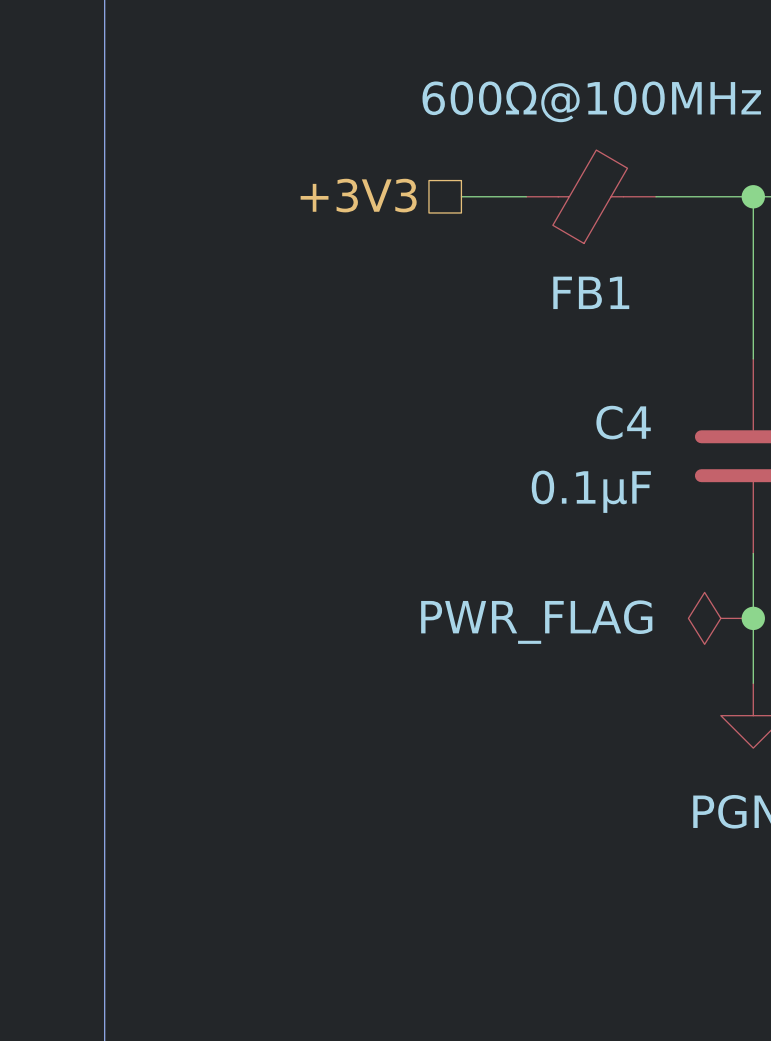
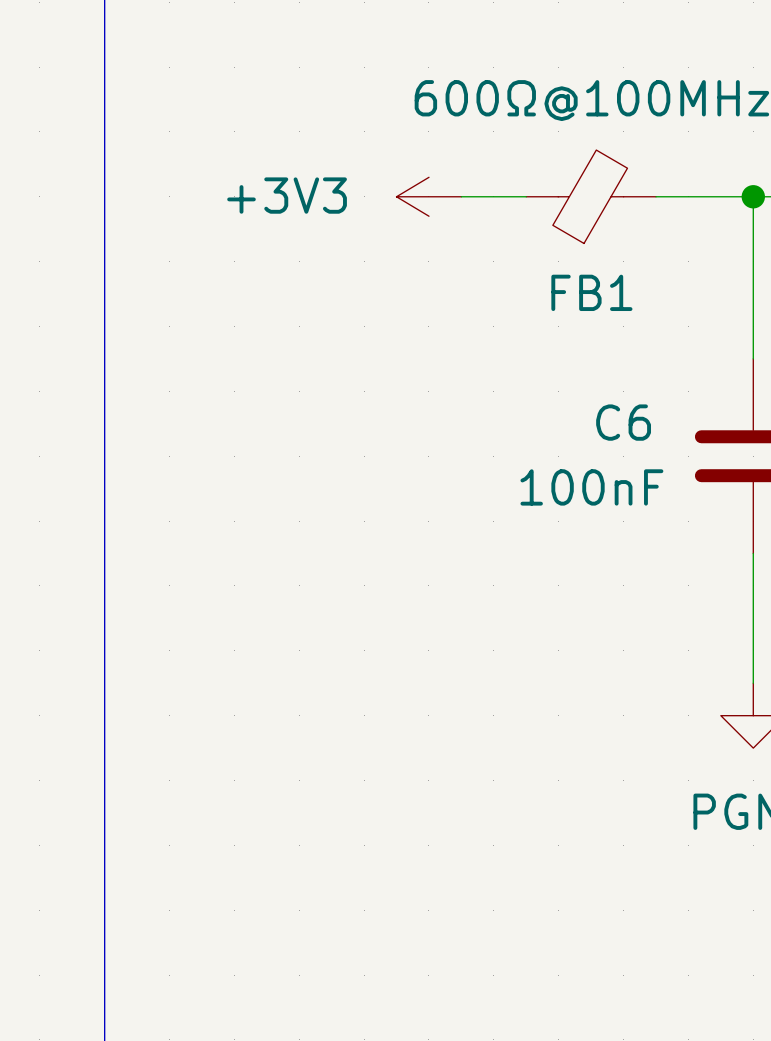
hierarchical label: +3V3 (358, 195) -> none
power symbol: none -> +3V3 (428, 196)
C4 name: C4 (623, 422) -> C6 (623, 422)
C4 value: 0.1µF (591, 491) -> 100nF (591, 487)
power symbol: PWR_FLAG (720, 618) -> none
junction: (753, 618) -> none

